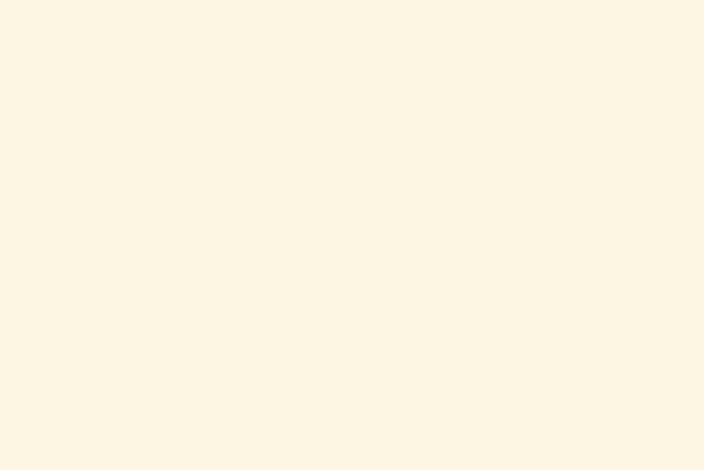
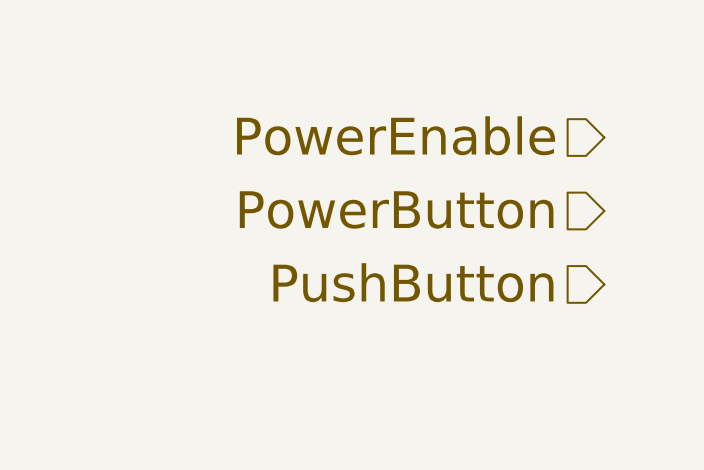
hierarchical label: none -> PowerEnable (396, 135)
hierarchical label: none -> PowerButton (396, 209)
hierarchical label: none -> PushButton (413, 282)

